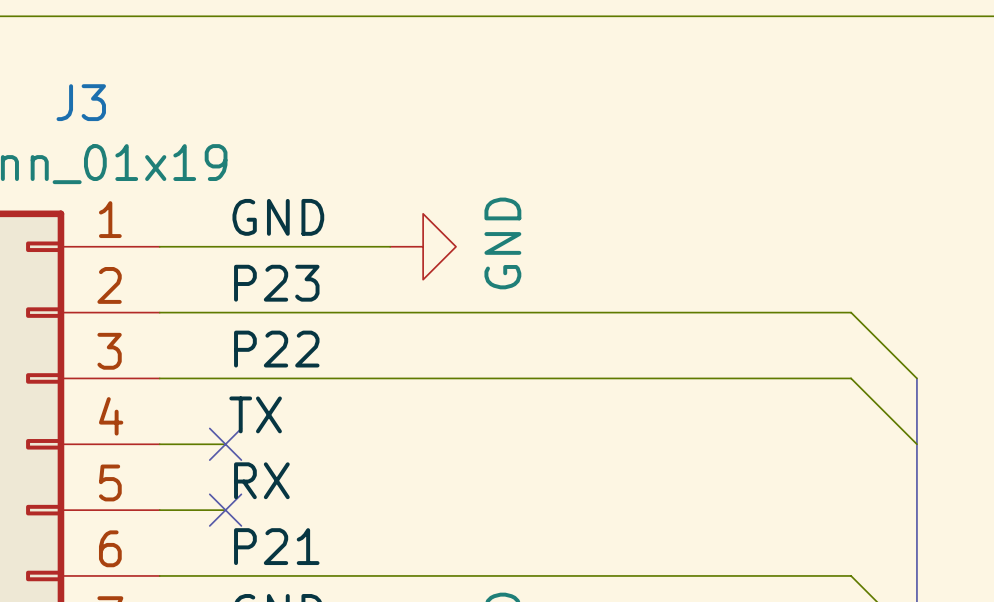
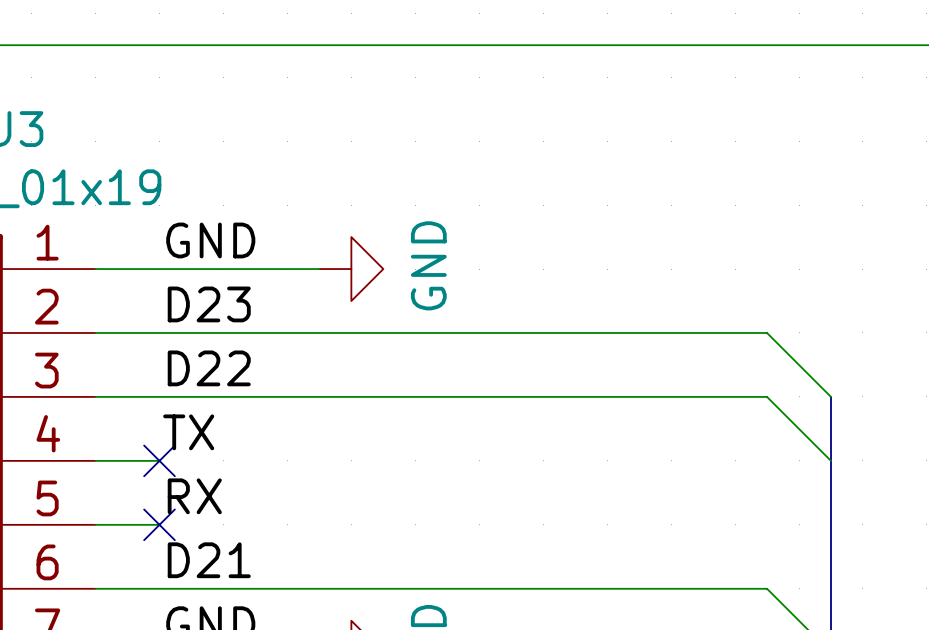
label: P23 (276, 283) -> D23 (209, 304)
label: P22 (276, 349) -> D22 (209, 368)
label: P21 (276, 546) -> D21 (209, 560)

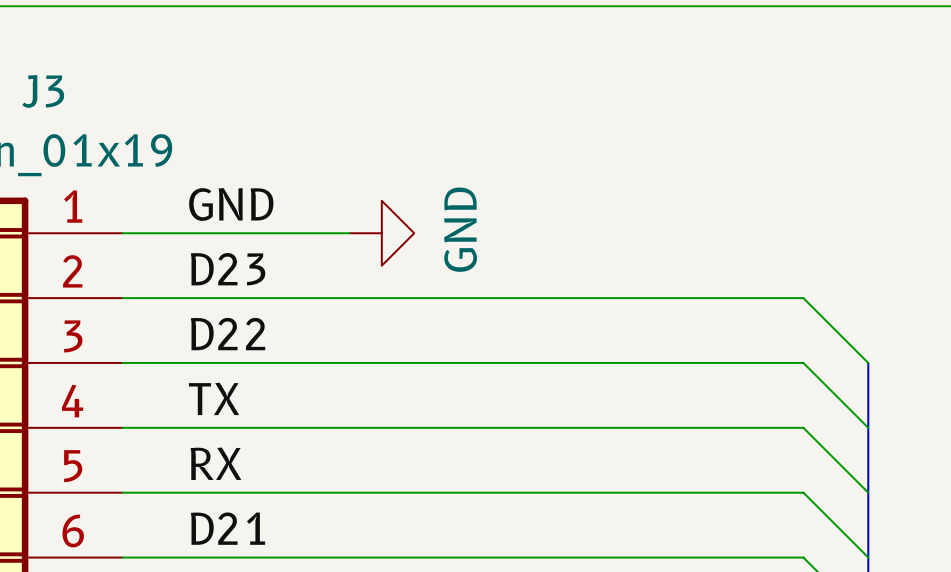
wire: none -> (187, 427) (803, 427) (868, 492)
no-connect mark: (159, 460) -> none
wire: none -> (187, 492) (803, 492) (868, 557)
no-connect mark: (159, 524) -> none

